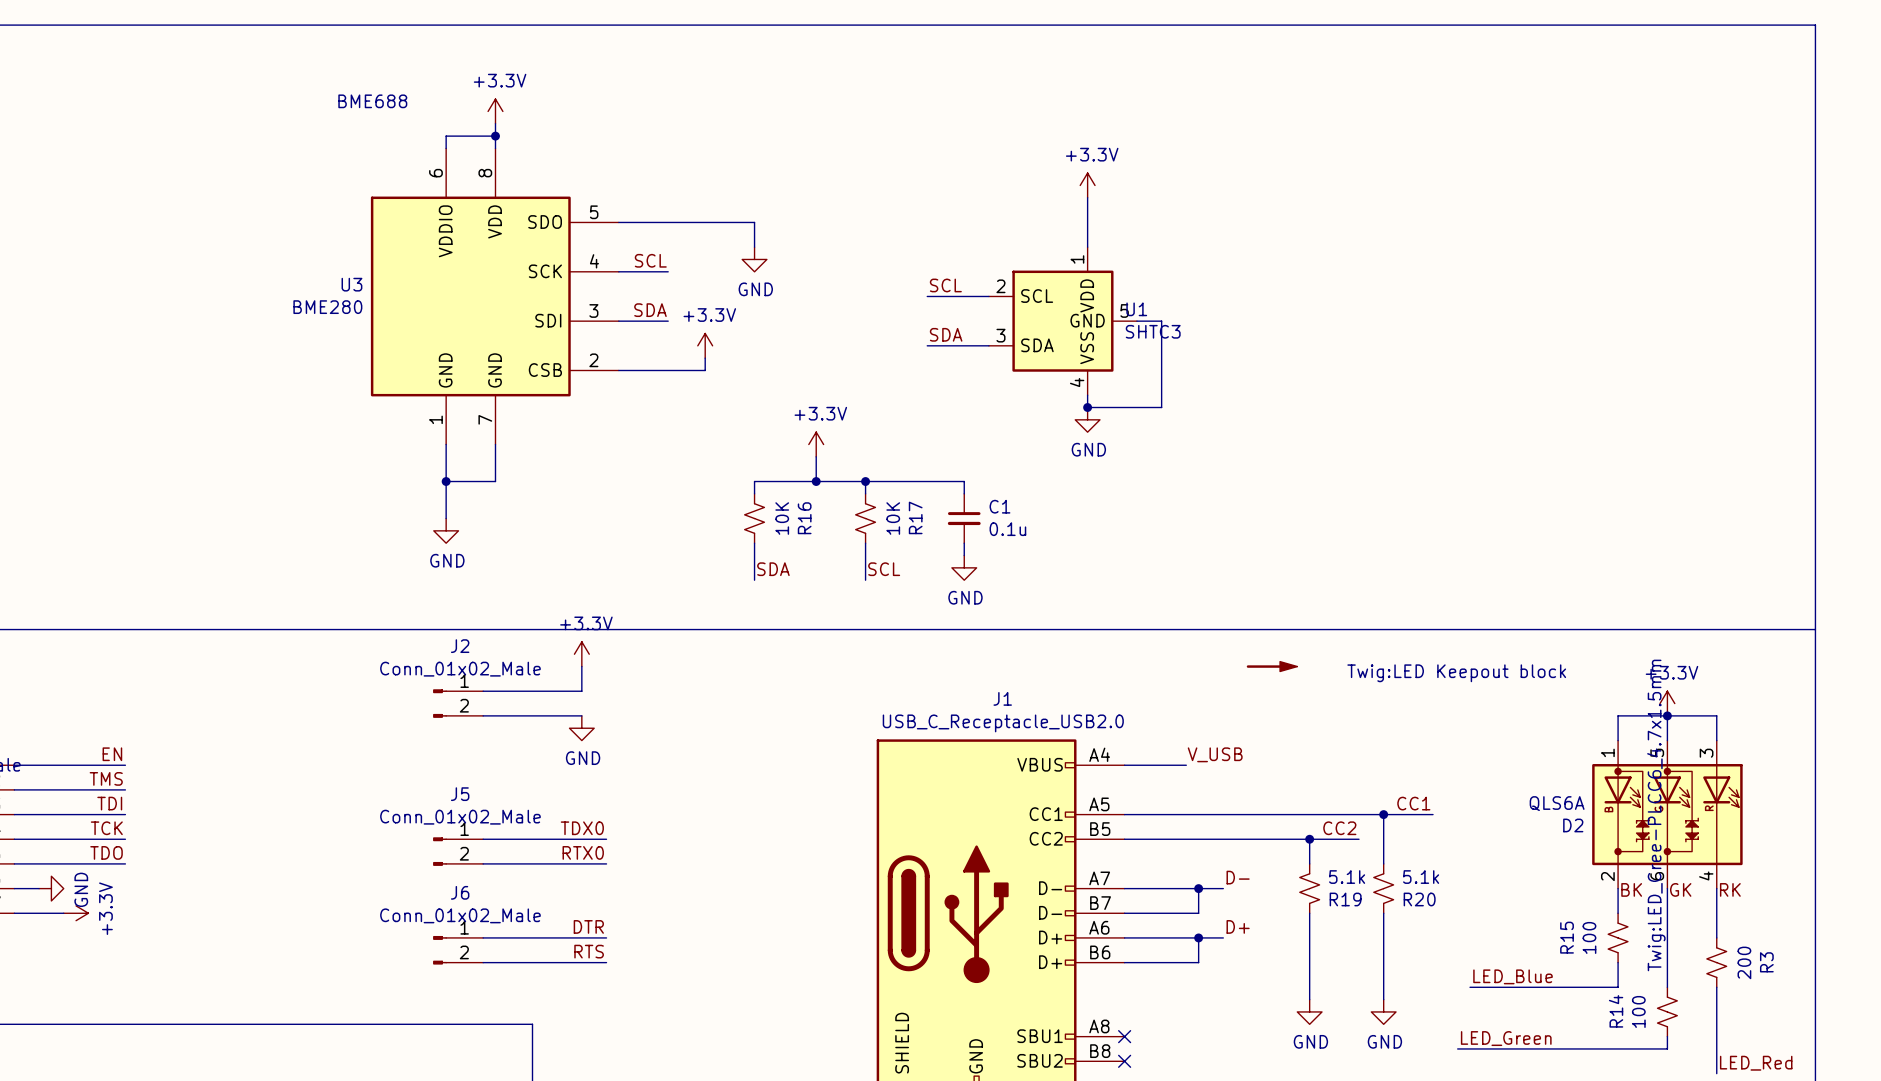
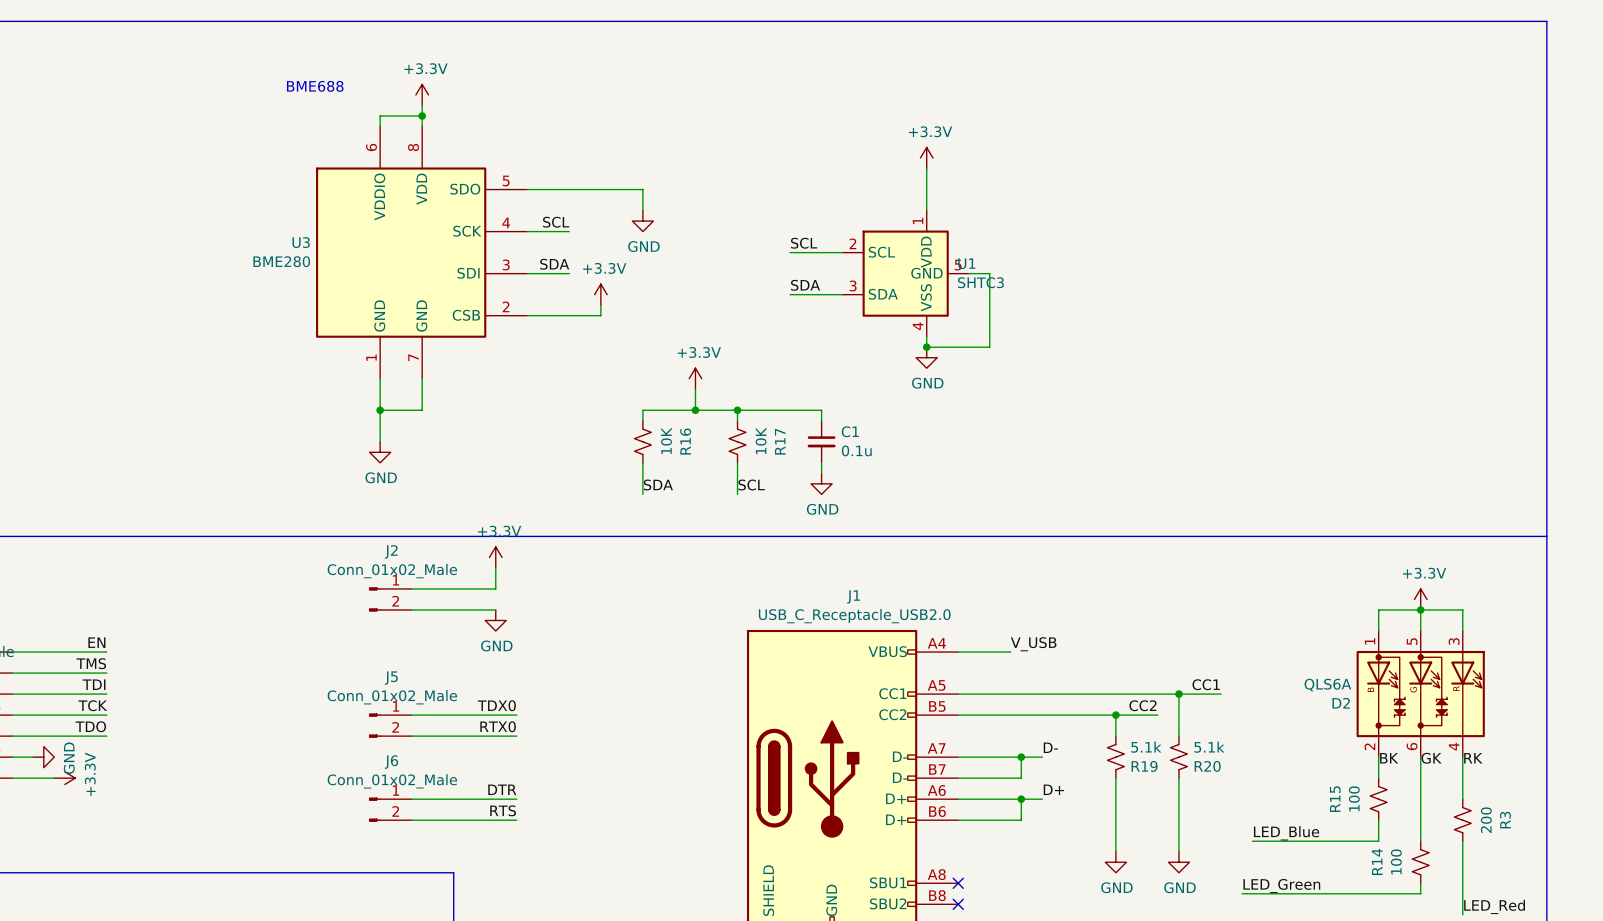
part: (1272, 666) -> none
D2 text: Twig:LED_Cree-PLCC6_4.7x1.5mm (1656, 815) -> none

